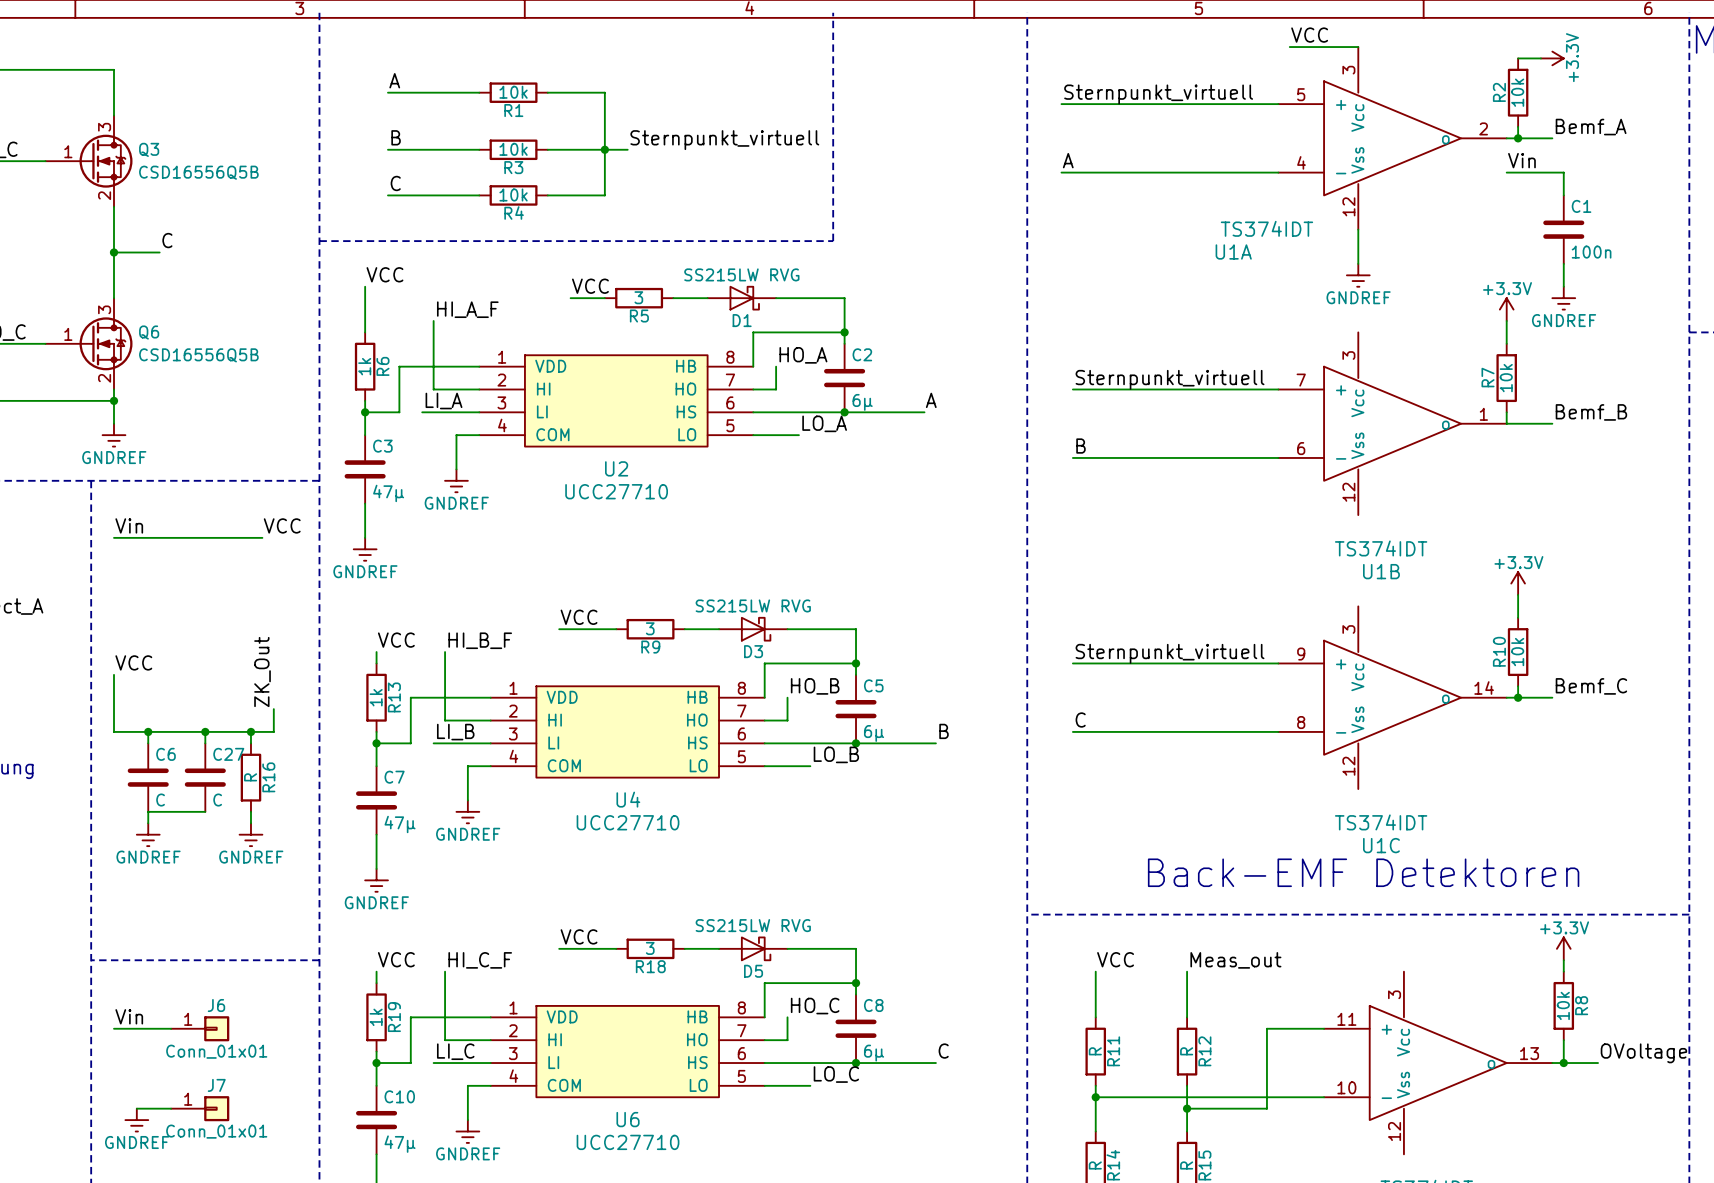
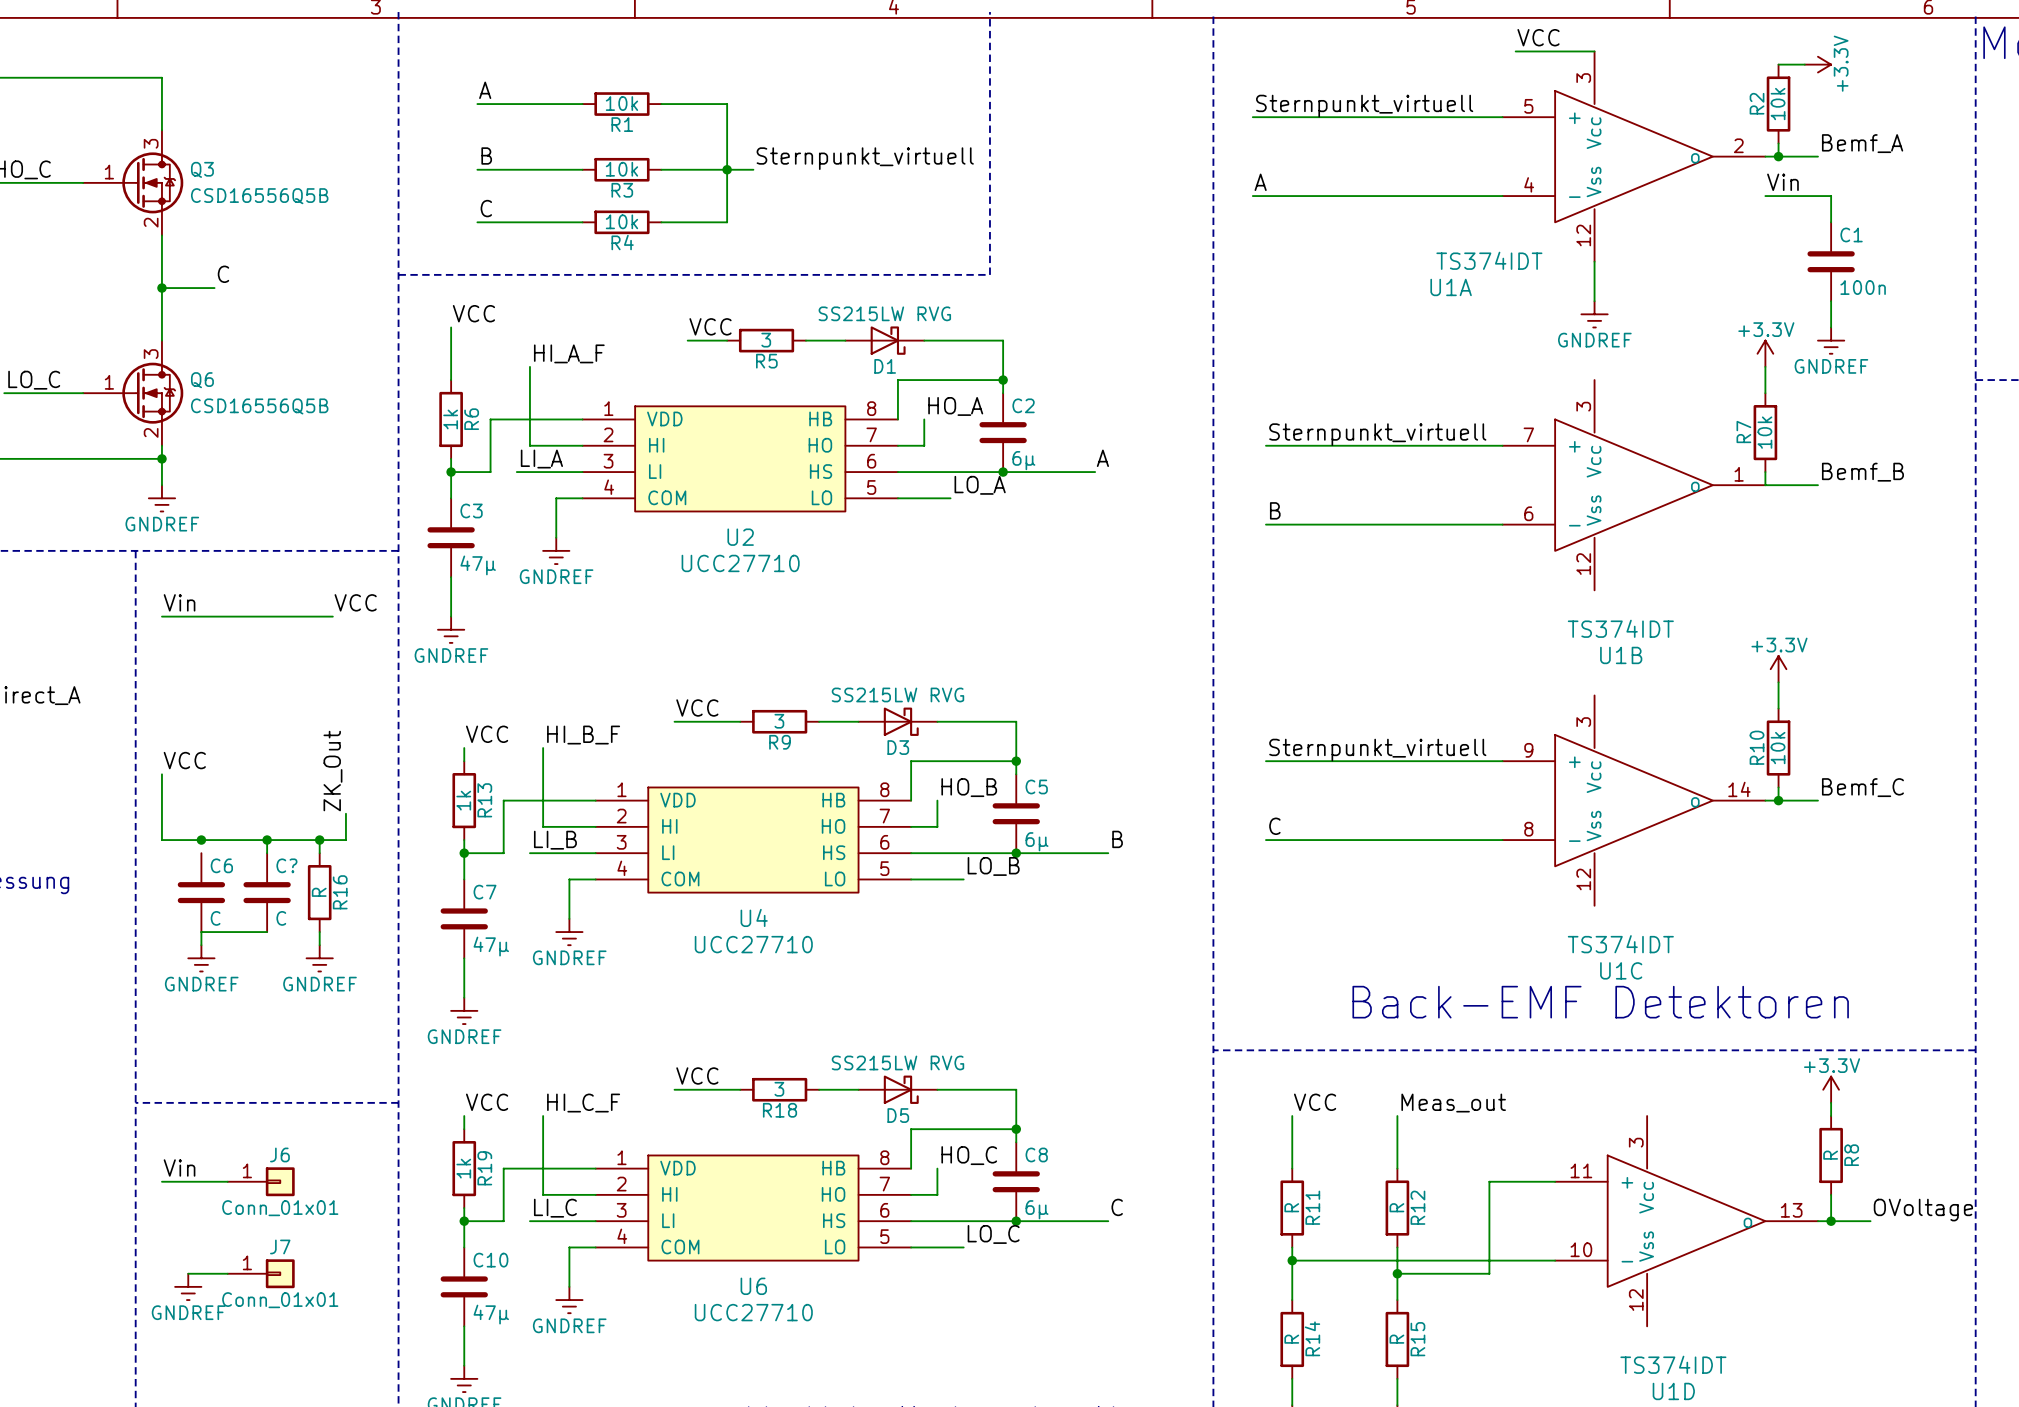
wire: (148, 731) (148, 743) -> none
C27 name: C27 (228, 754) -> C? (286, 865)
R8 value: 10k (1563, 1005) -> R (1830, 1155)

